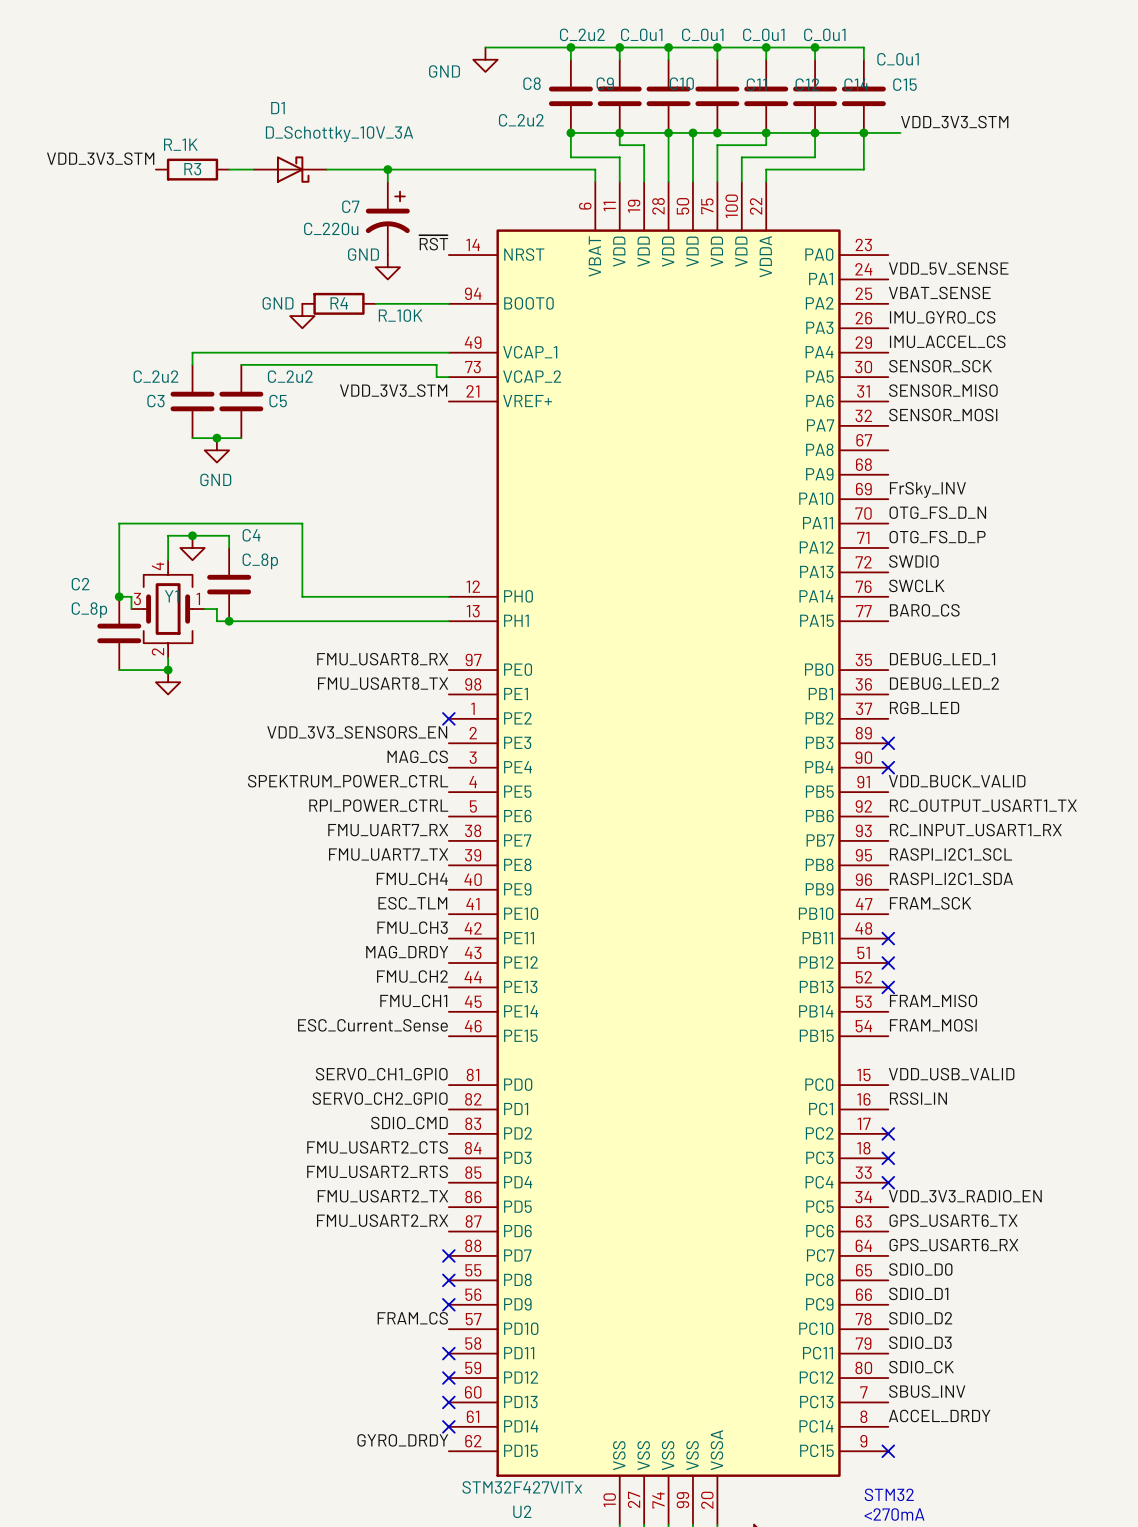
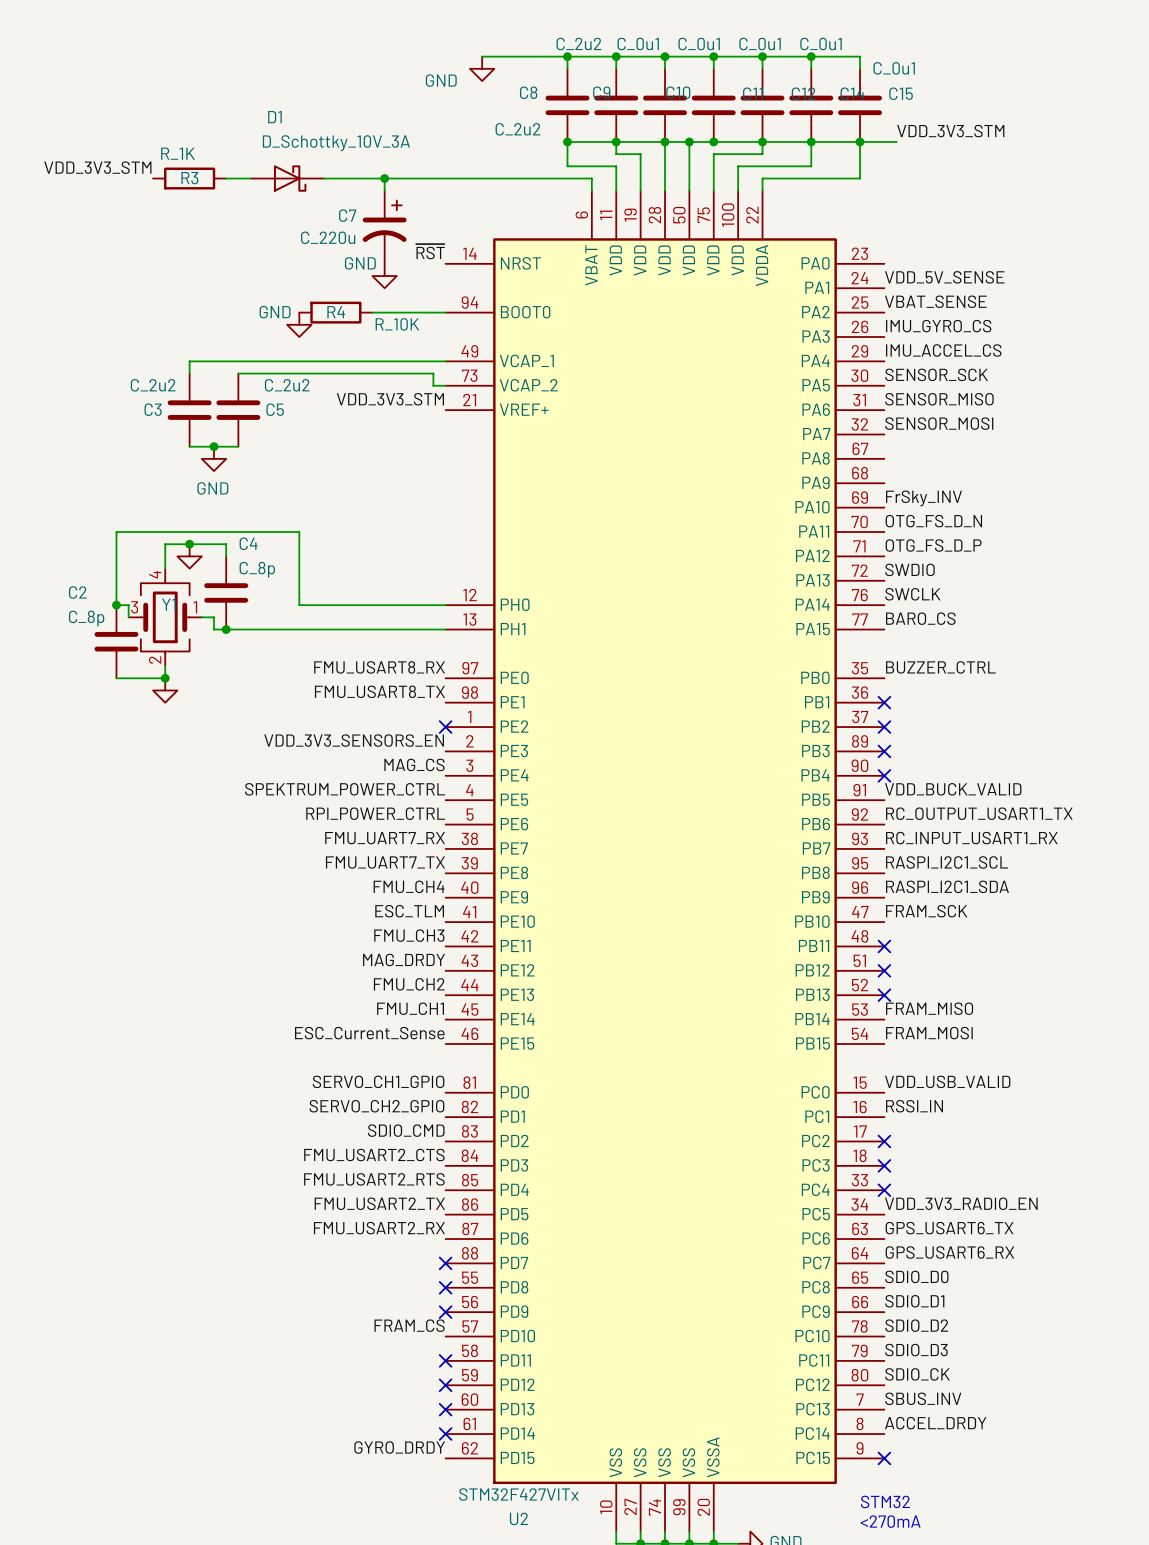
label: DEBUG_LED_1 (942, 659) -> BUZZER_CTRL (940, 667)
label: DEBUG_LED_2 (944, 683) -> none
no-connect mark: none -> (884, 702)
label: RGB_LED (924, 707) -> none
no-connect mark: none -> (884, 727)

